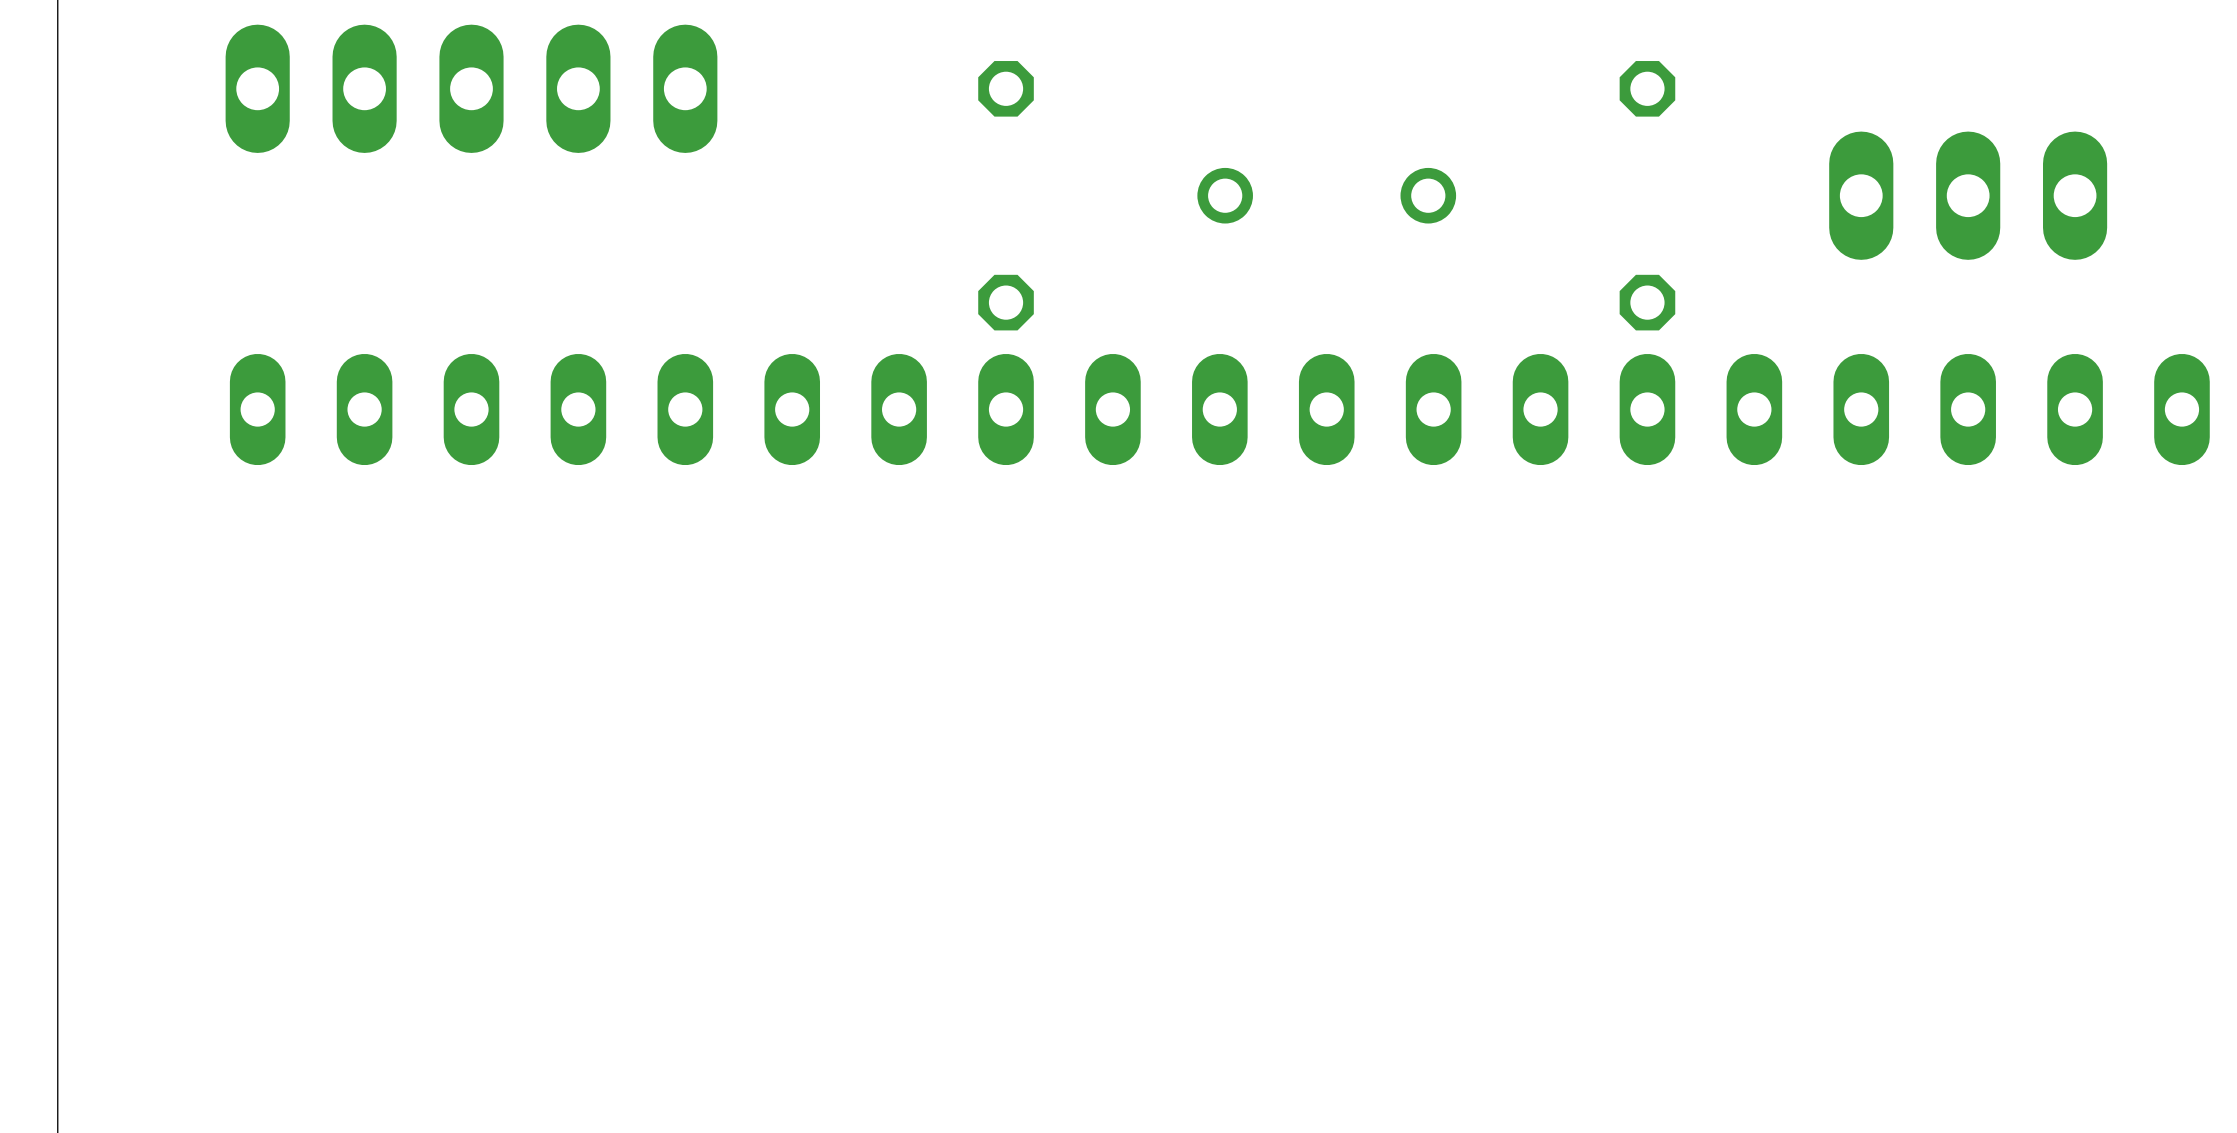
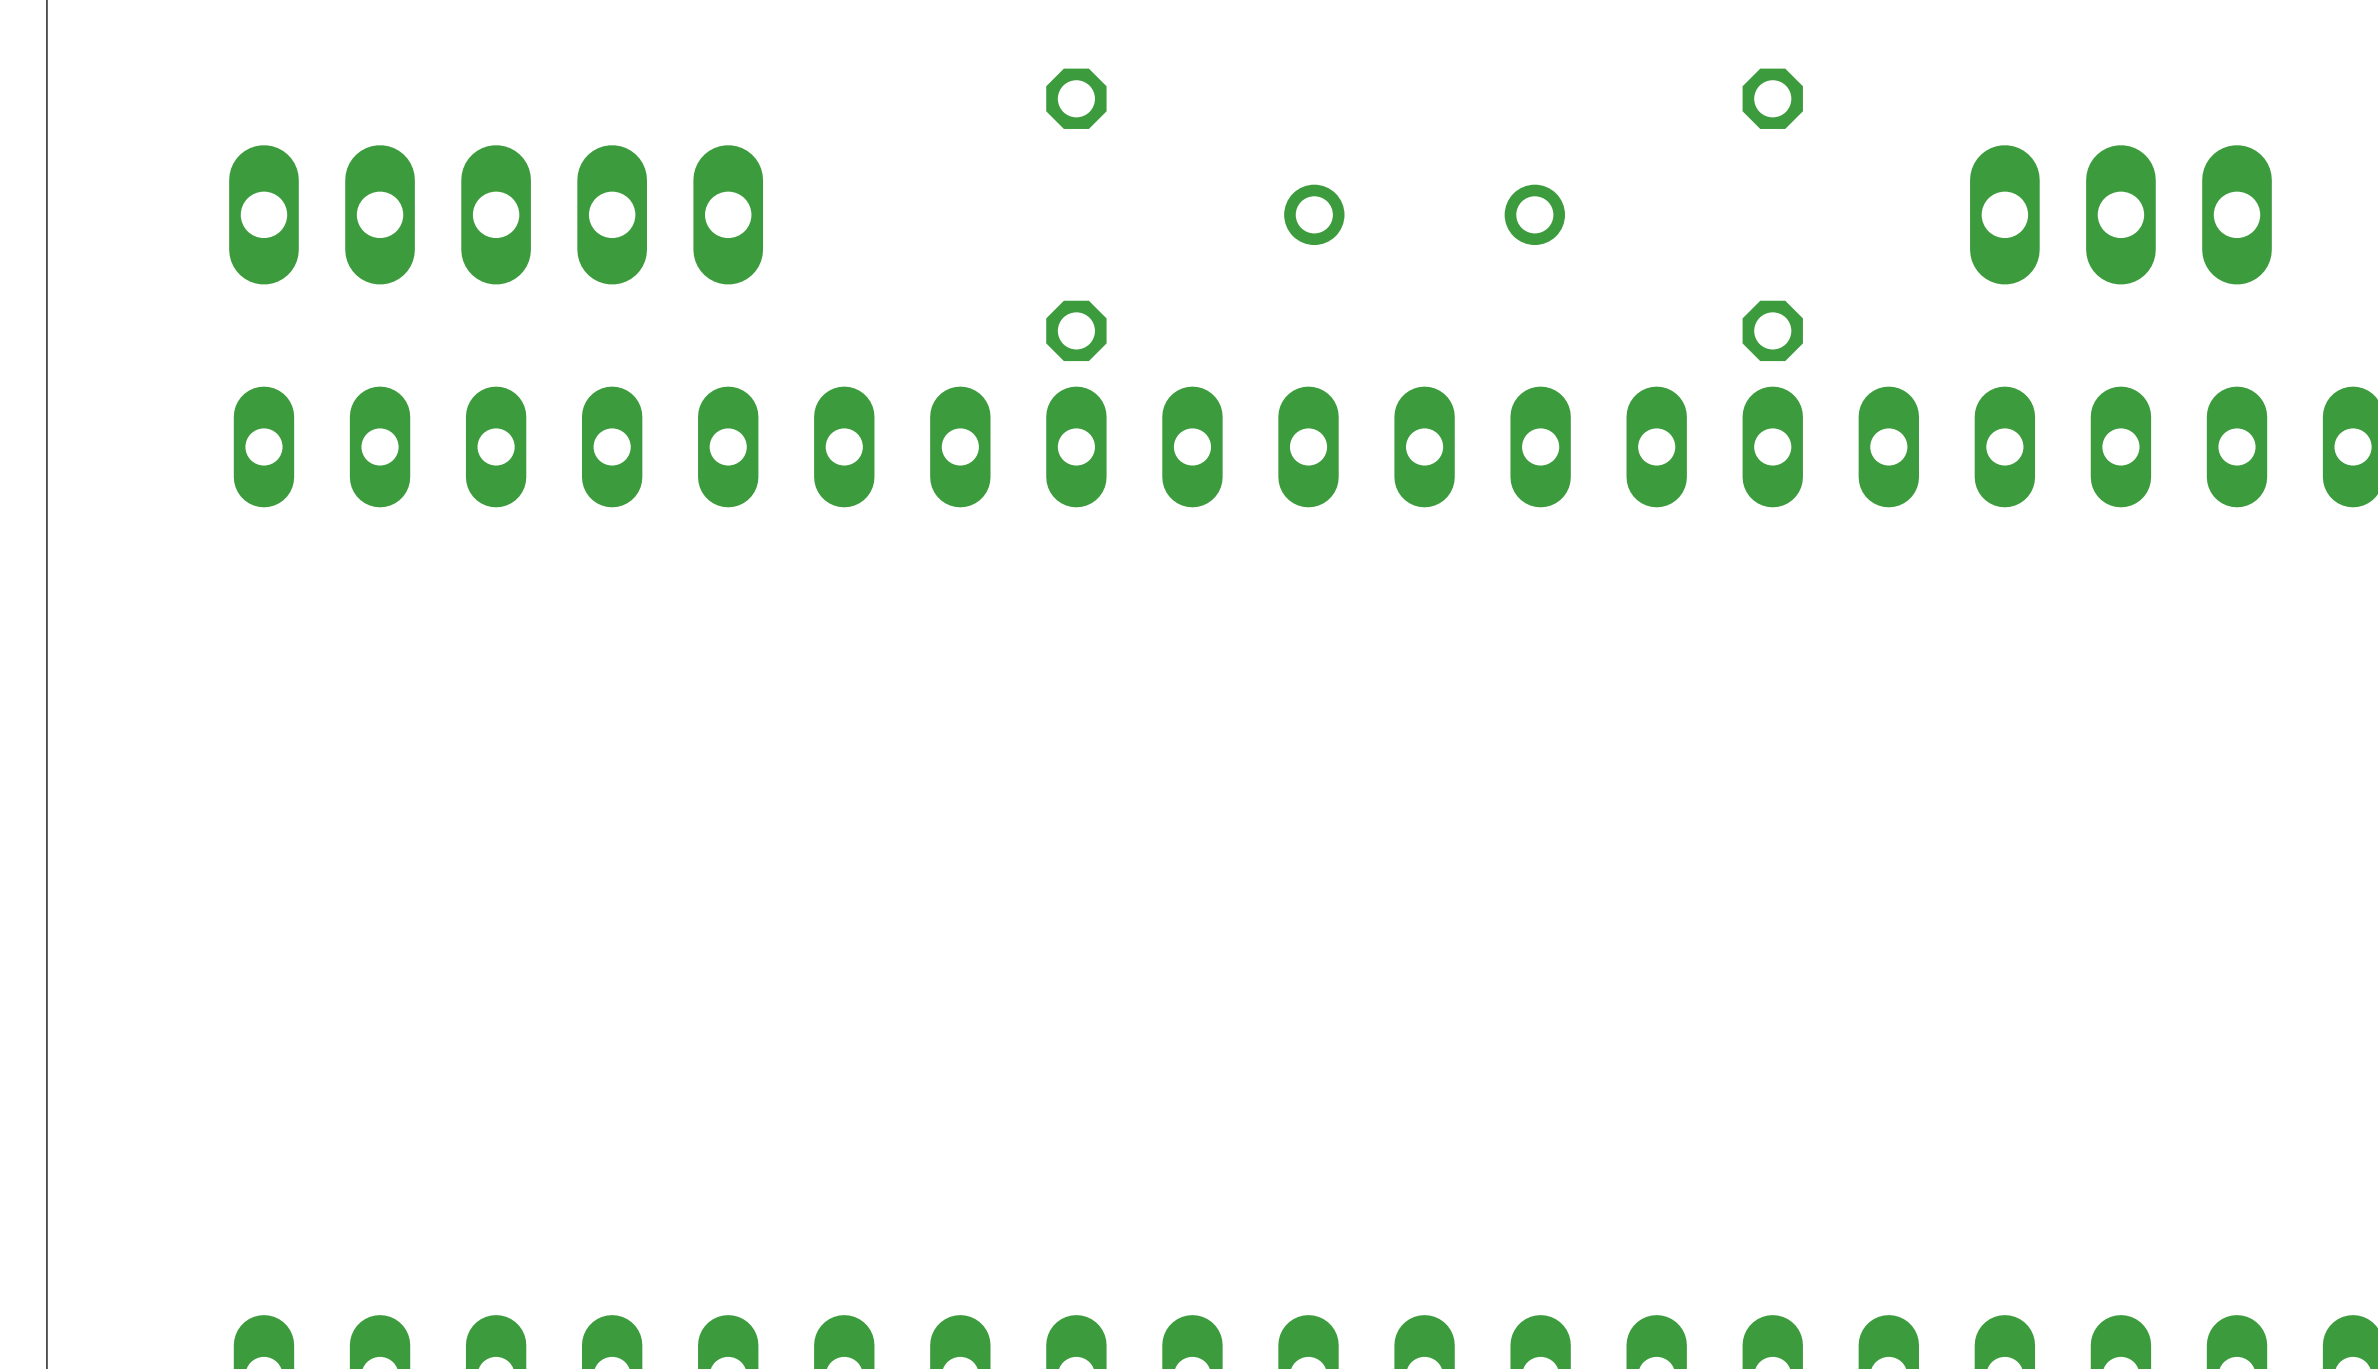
part position: (471, 88) -> (496, 214)

